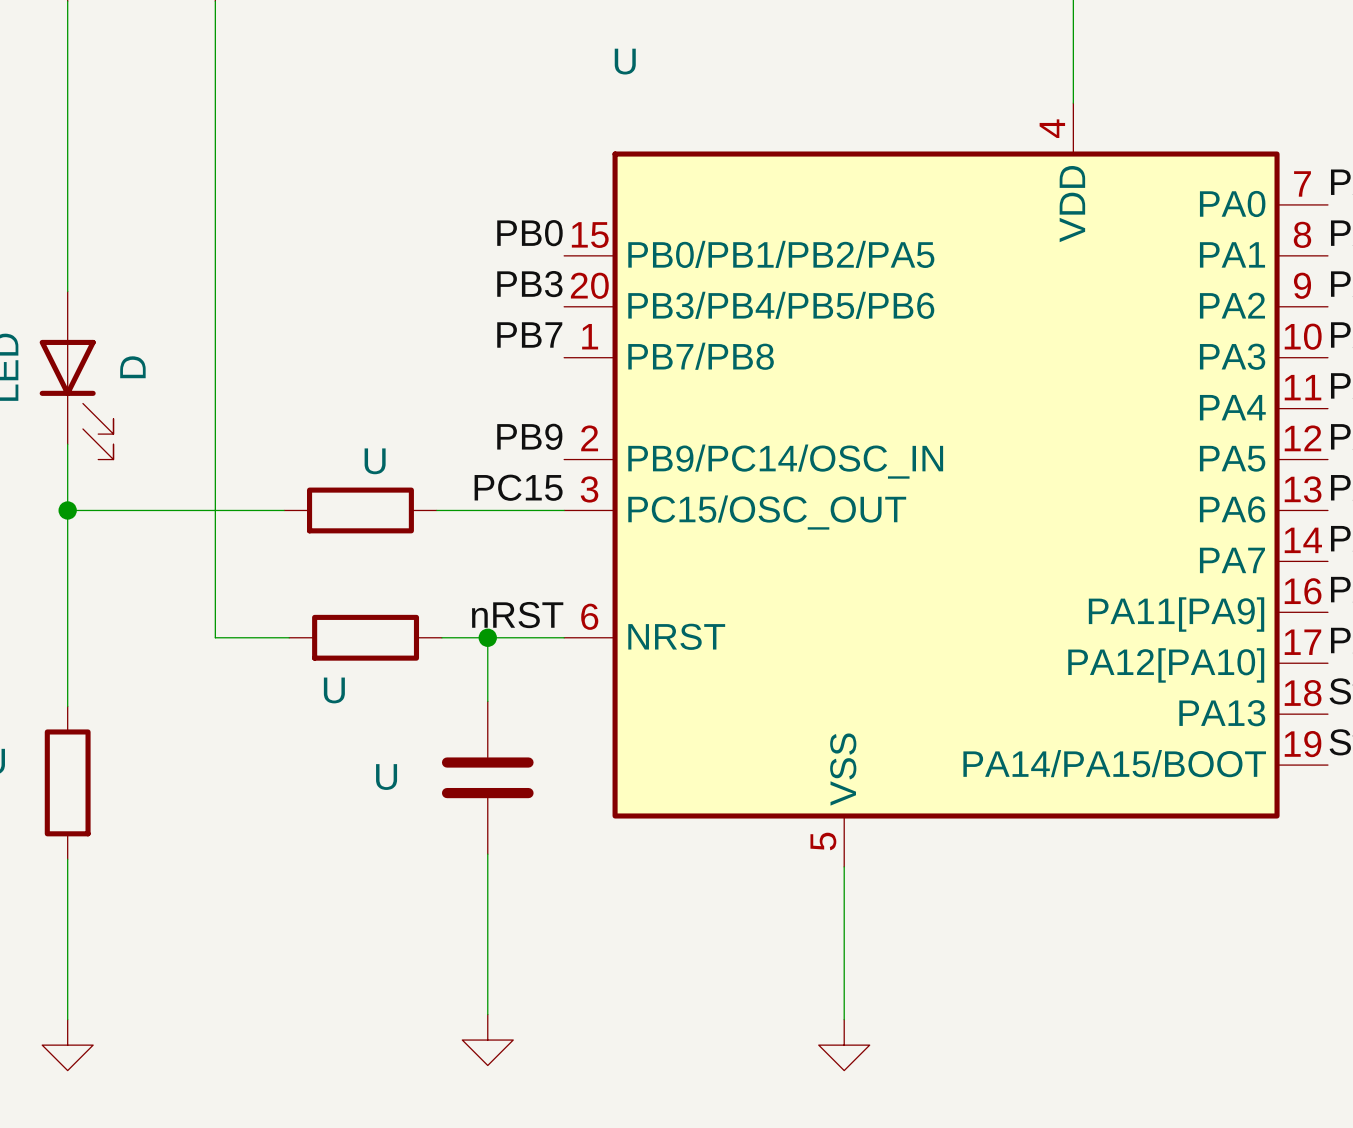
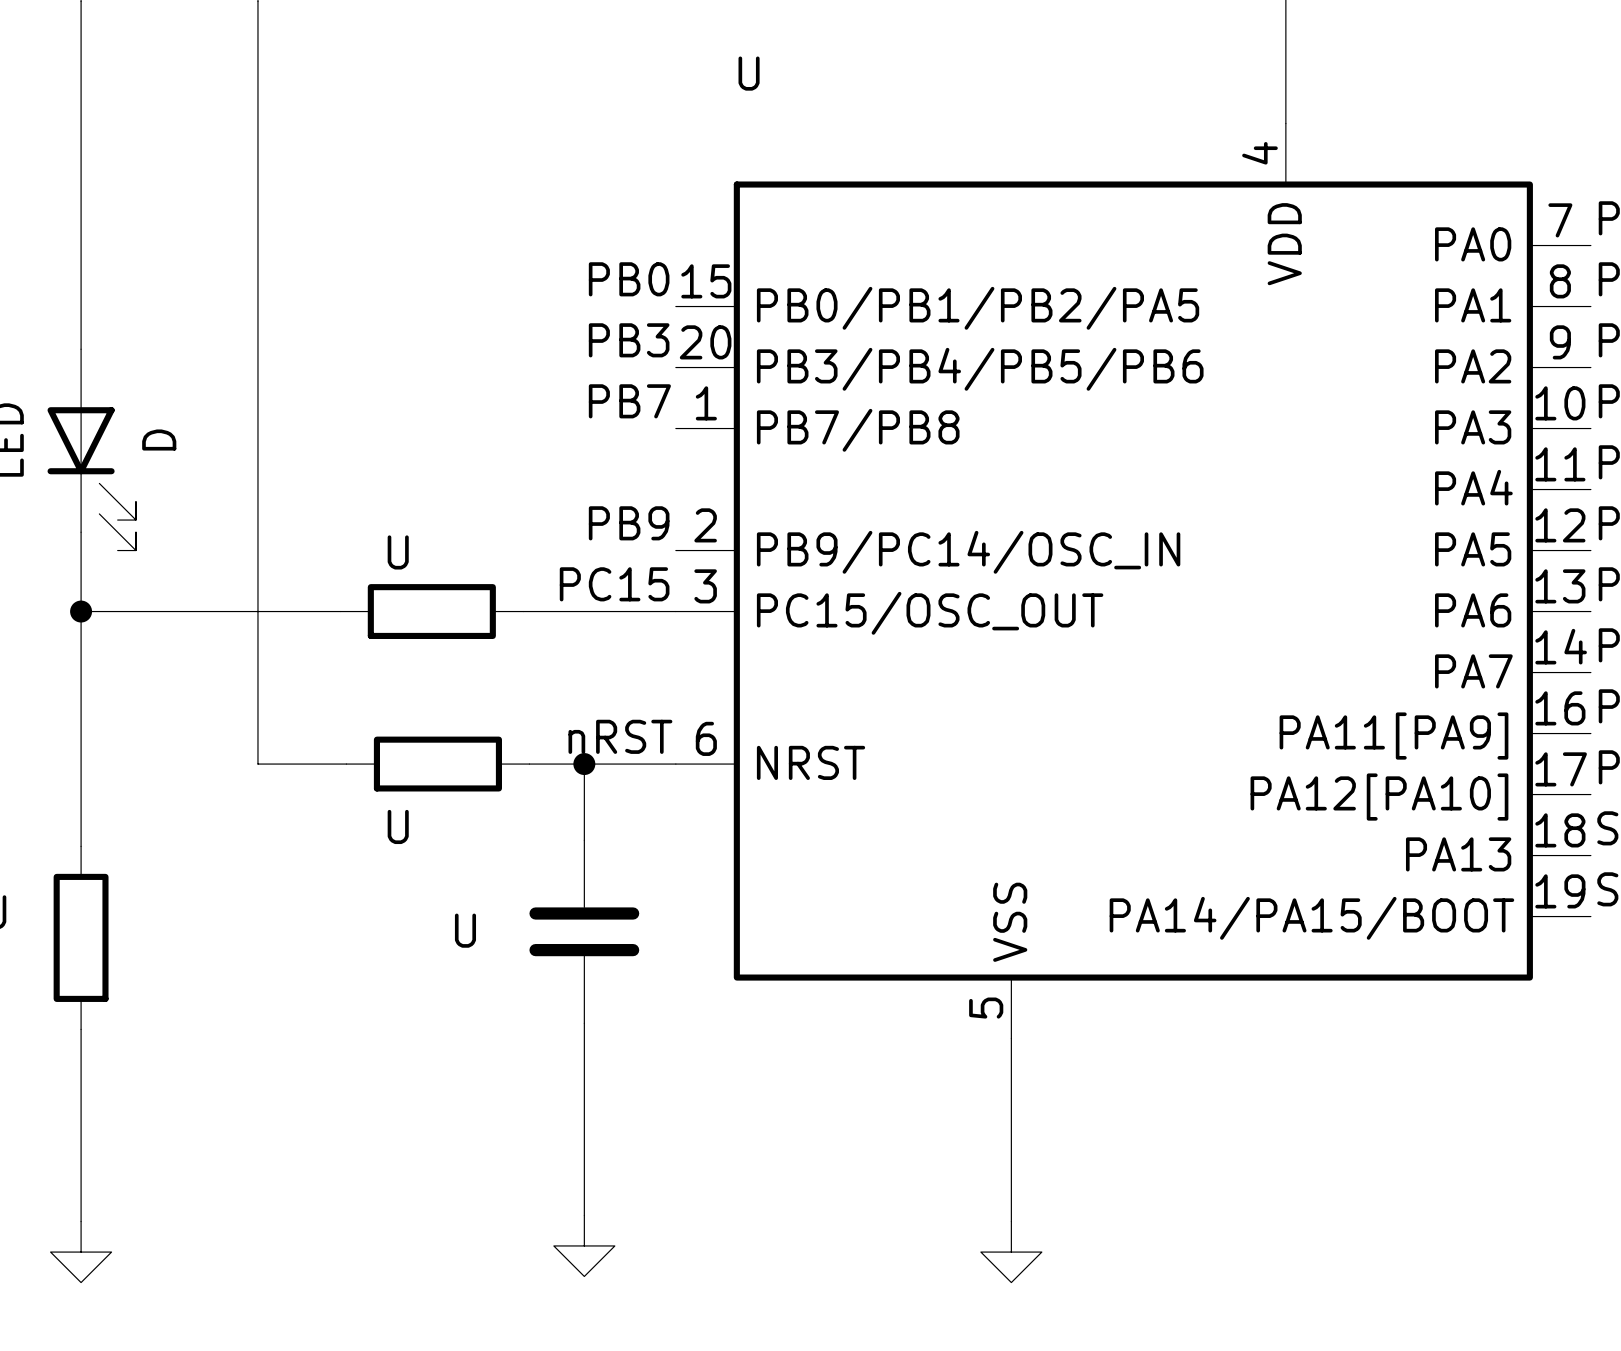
U name position: U (375, 461) -> U (398, 552)

